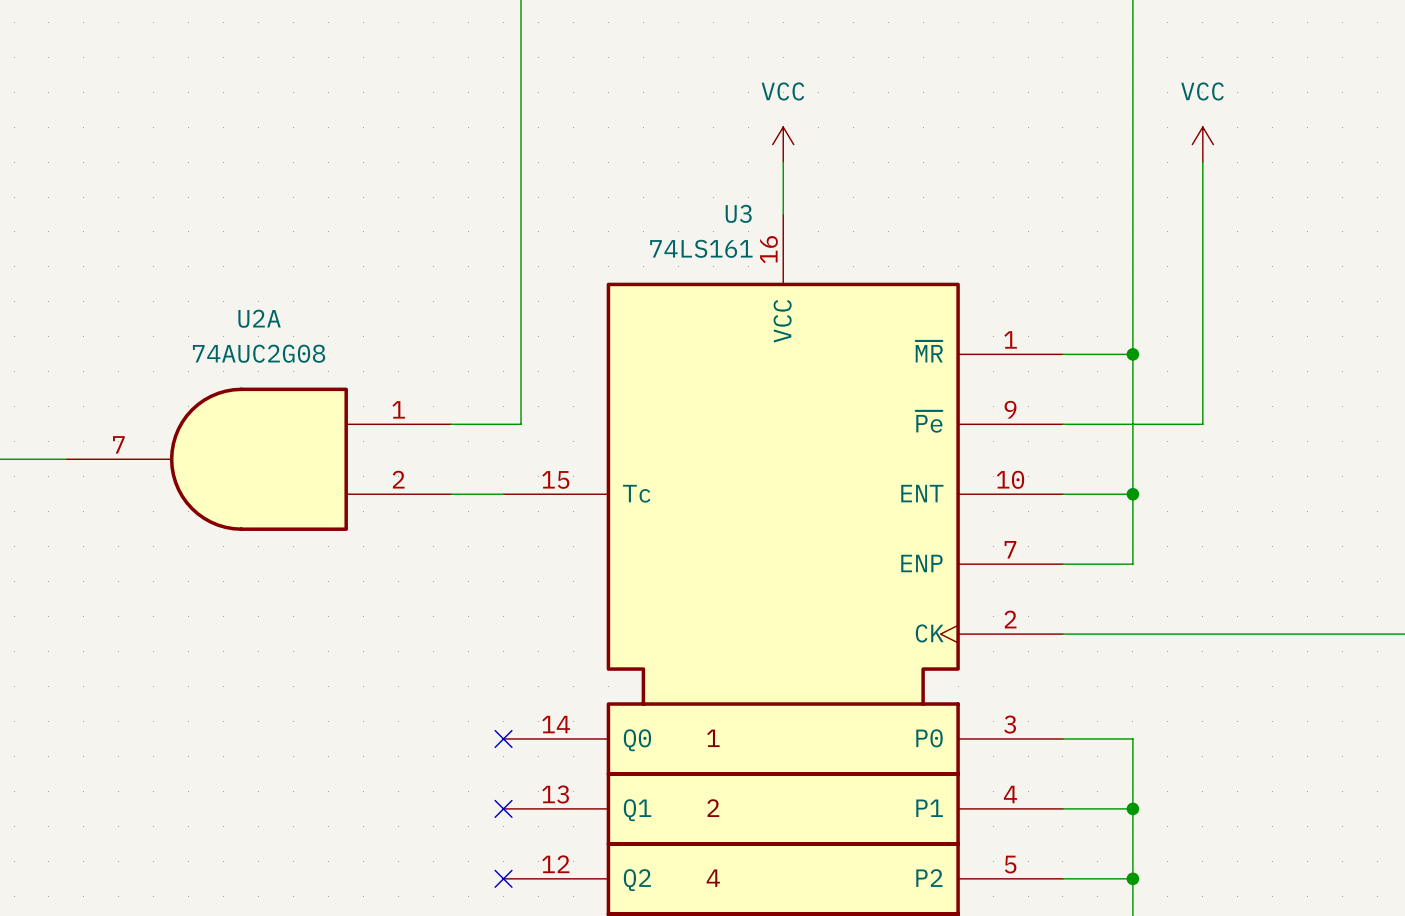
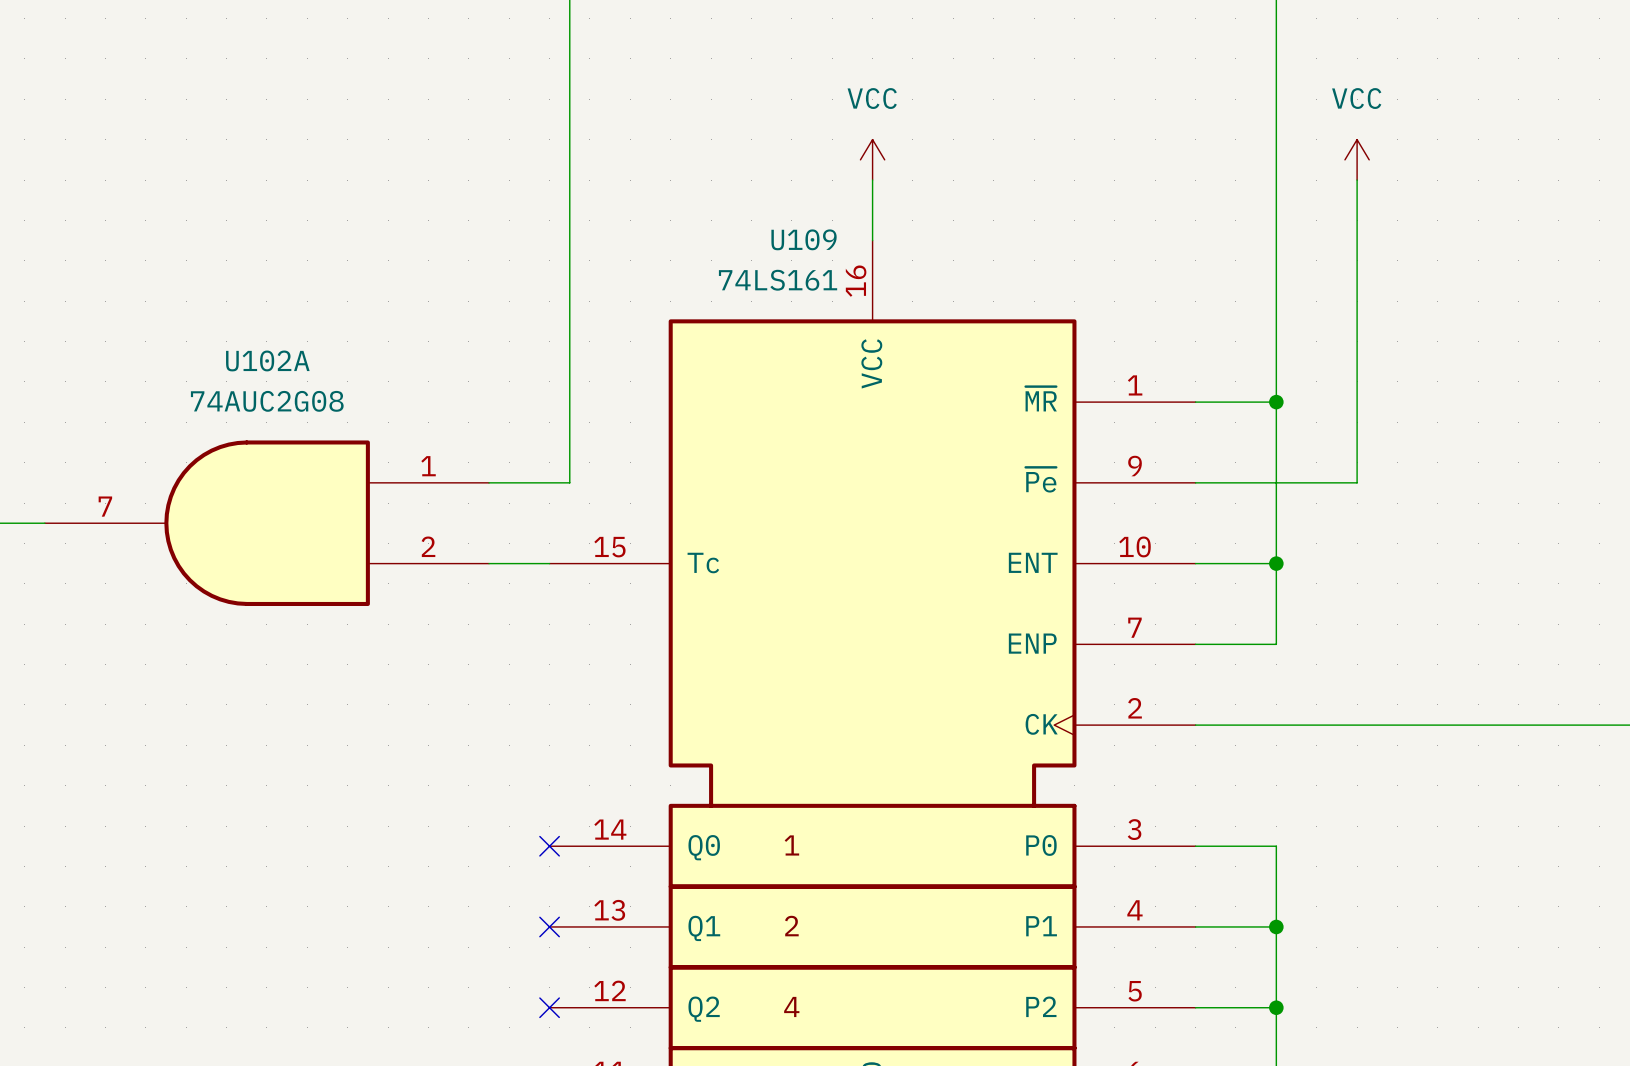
U3 name: U3 (738, 213) -> U109 (804, 239)
U2A name: U2A (259, 318) -> U102A (267, 360)

